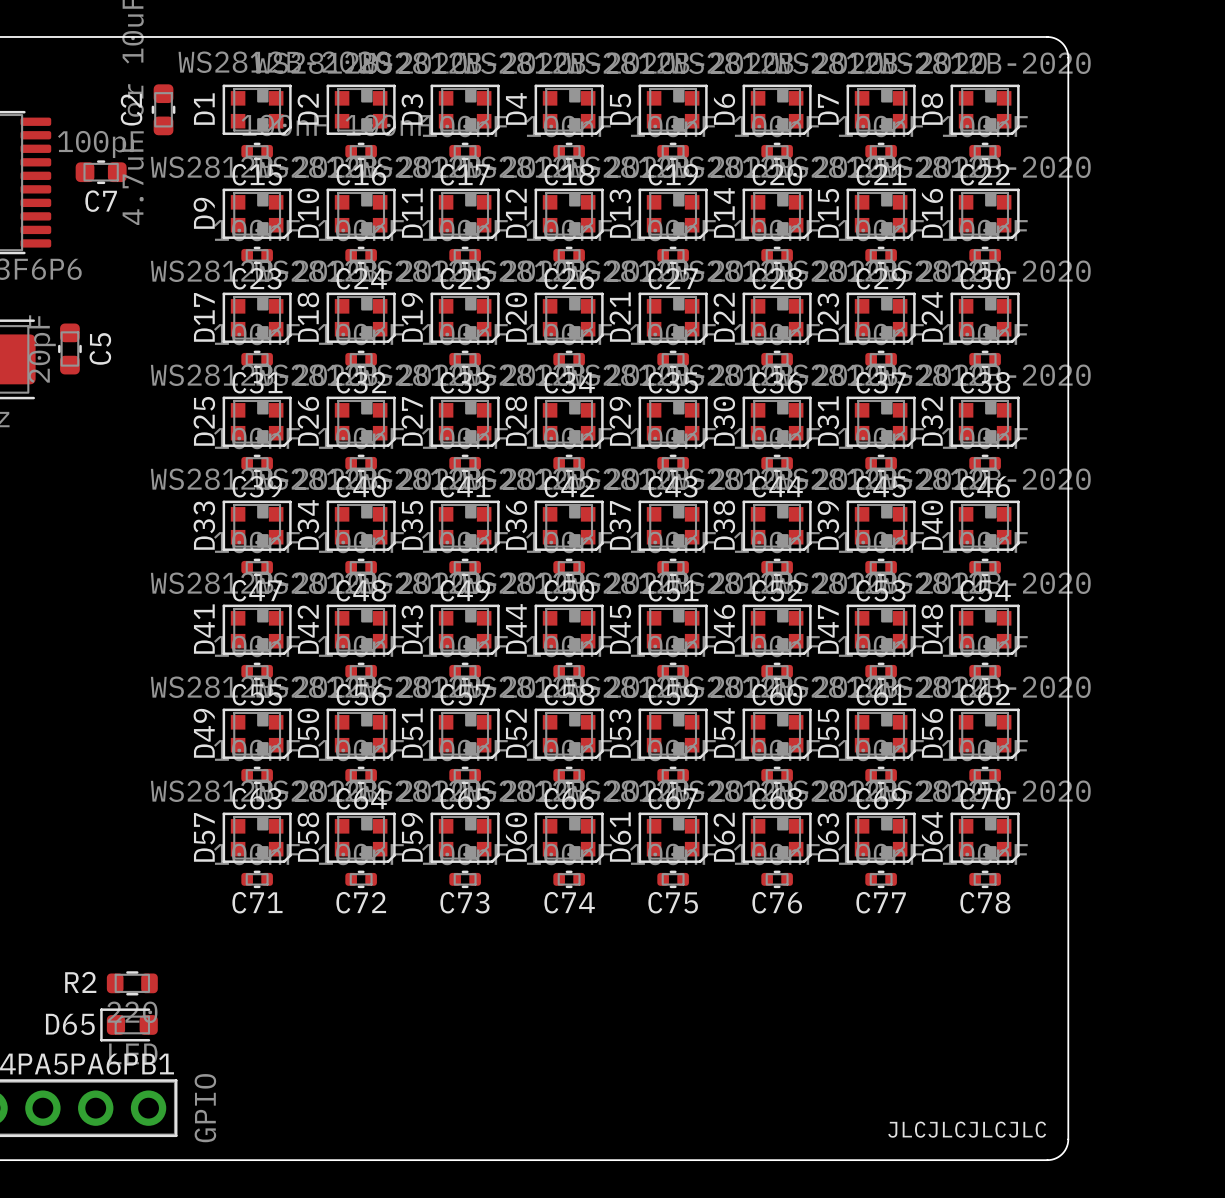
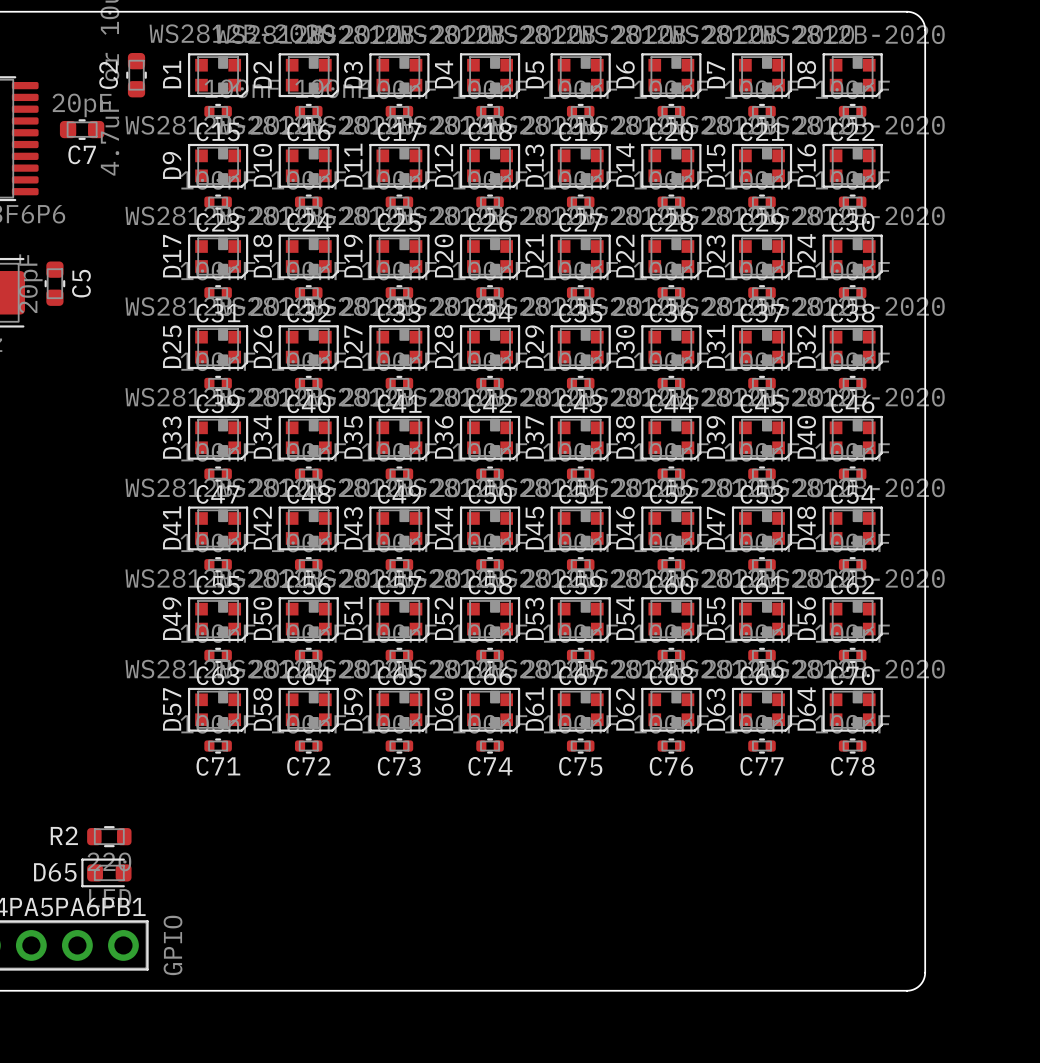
C7 value: 100pF (100, 144) -> 20pF (82, 105)
text: JLCJLCJLCJLC (967, 1129) -> none

